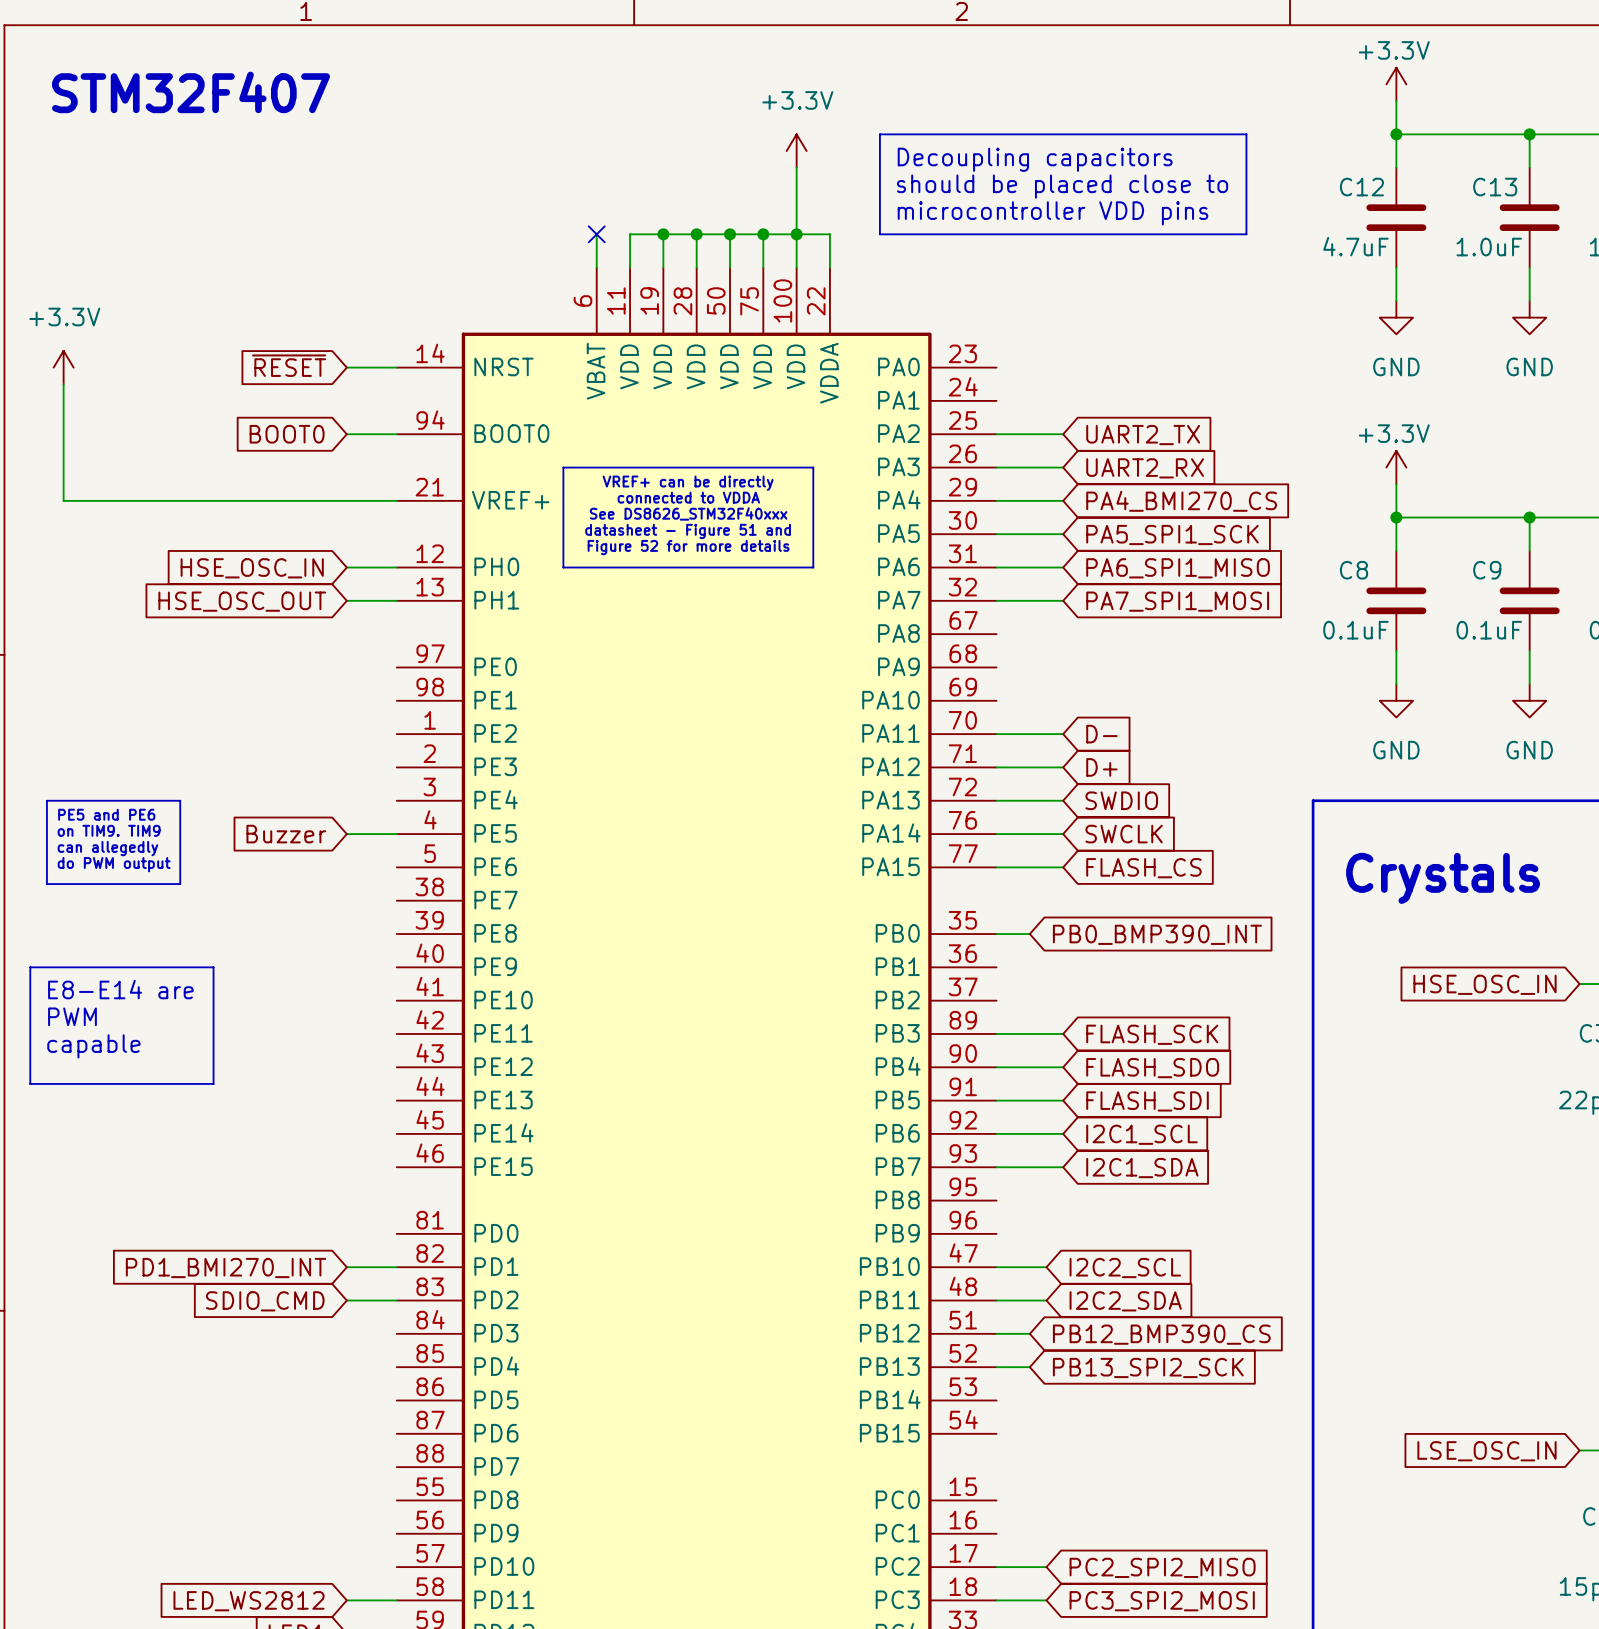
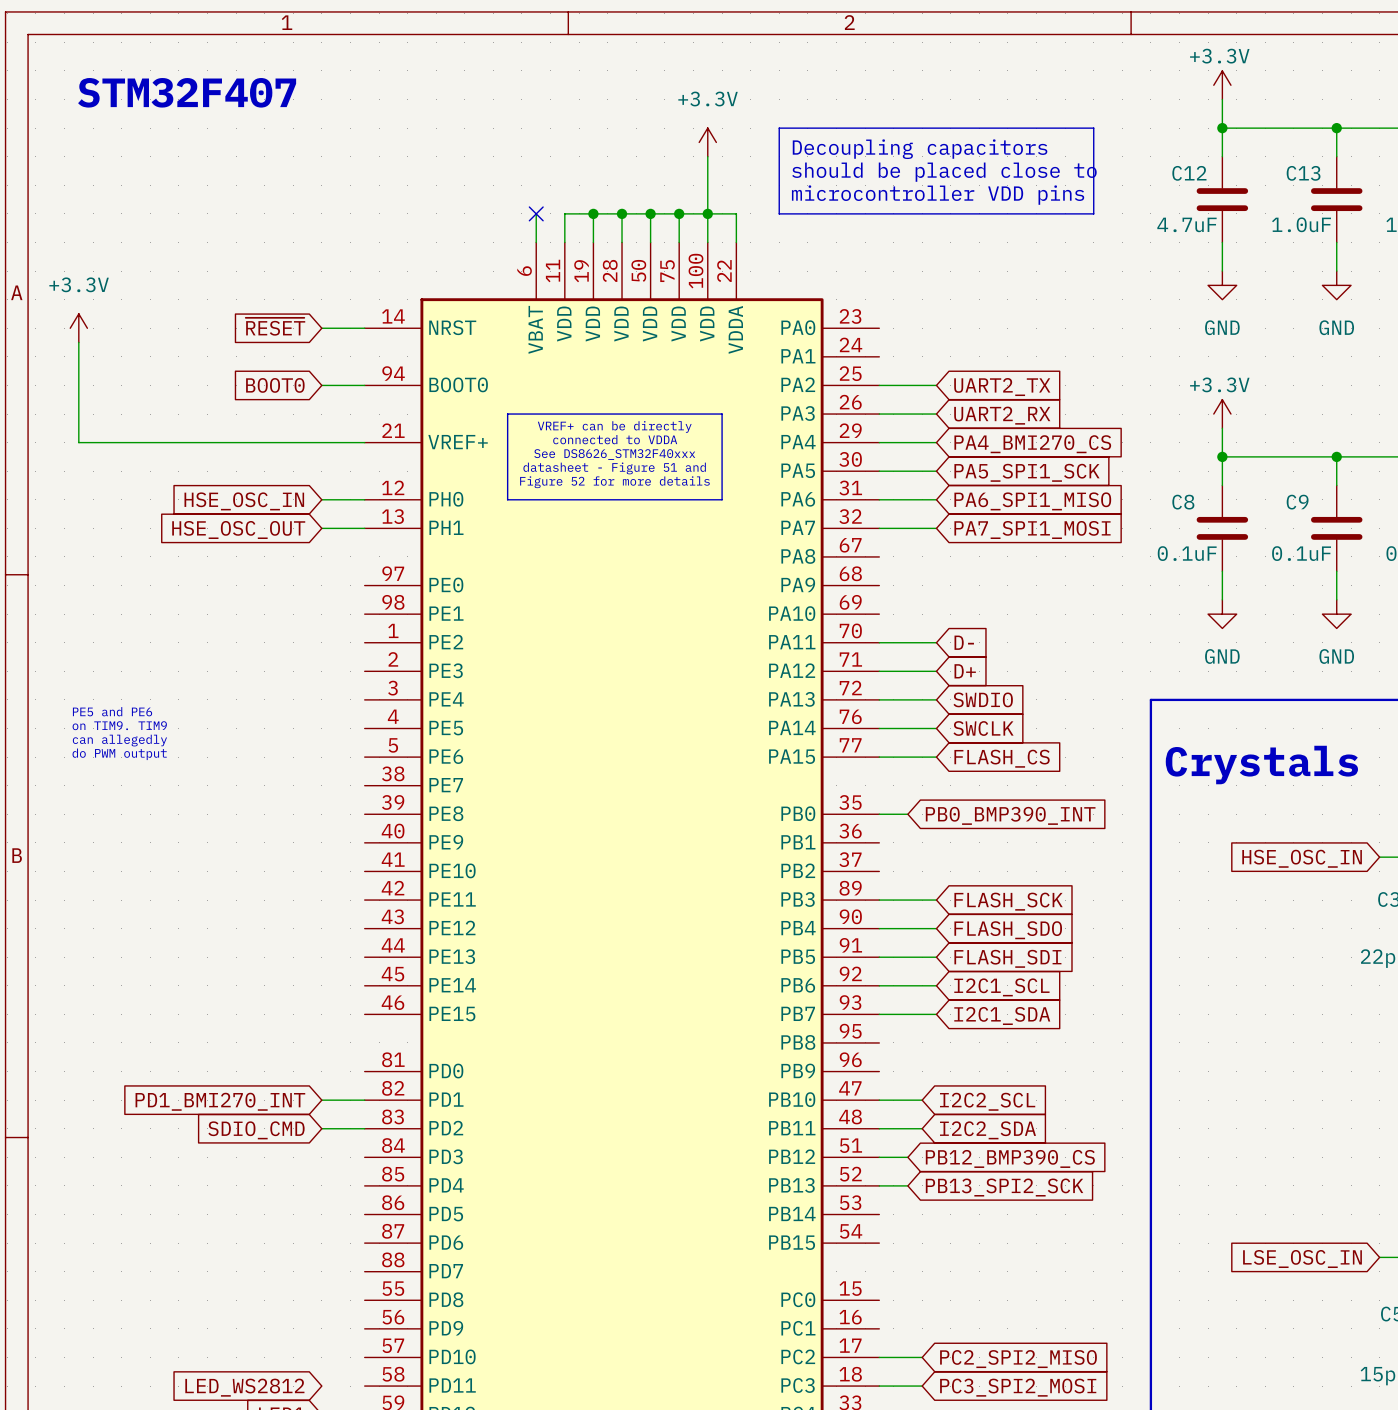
line: (46, 800) (180, 800) (180, 884) (46, 884) (46, 800) -> none
global label: Buzzer (286, 834) -> none
wire: (346, 834) (396, 834) -> none
line: (30, 967) (213, 967) (213, 1083) (30, 1083) (30, 967) -> none
text: E8-E14 are (120, 989) -> none
text: PWM (72, 1016) -> none
text: capable (93, 1046) -> none
wire: (346, 1600) (396, 1600) -> none

